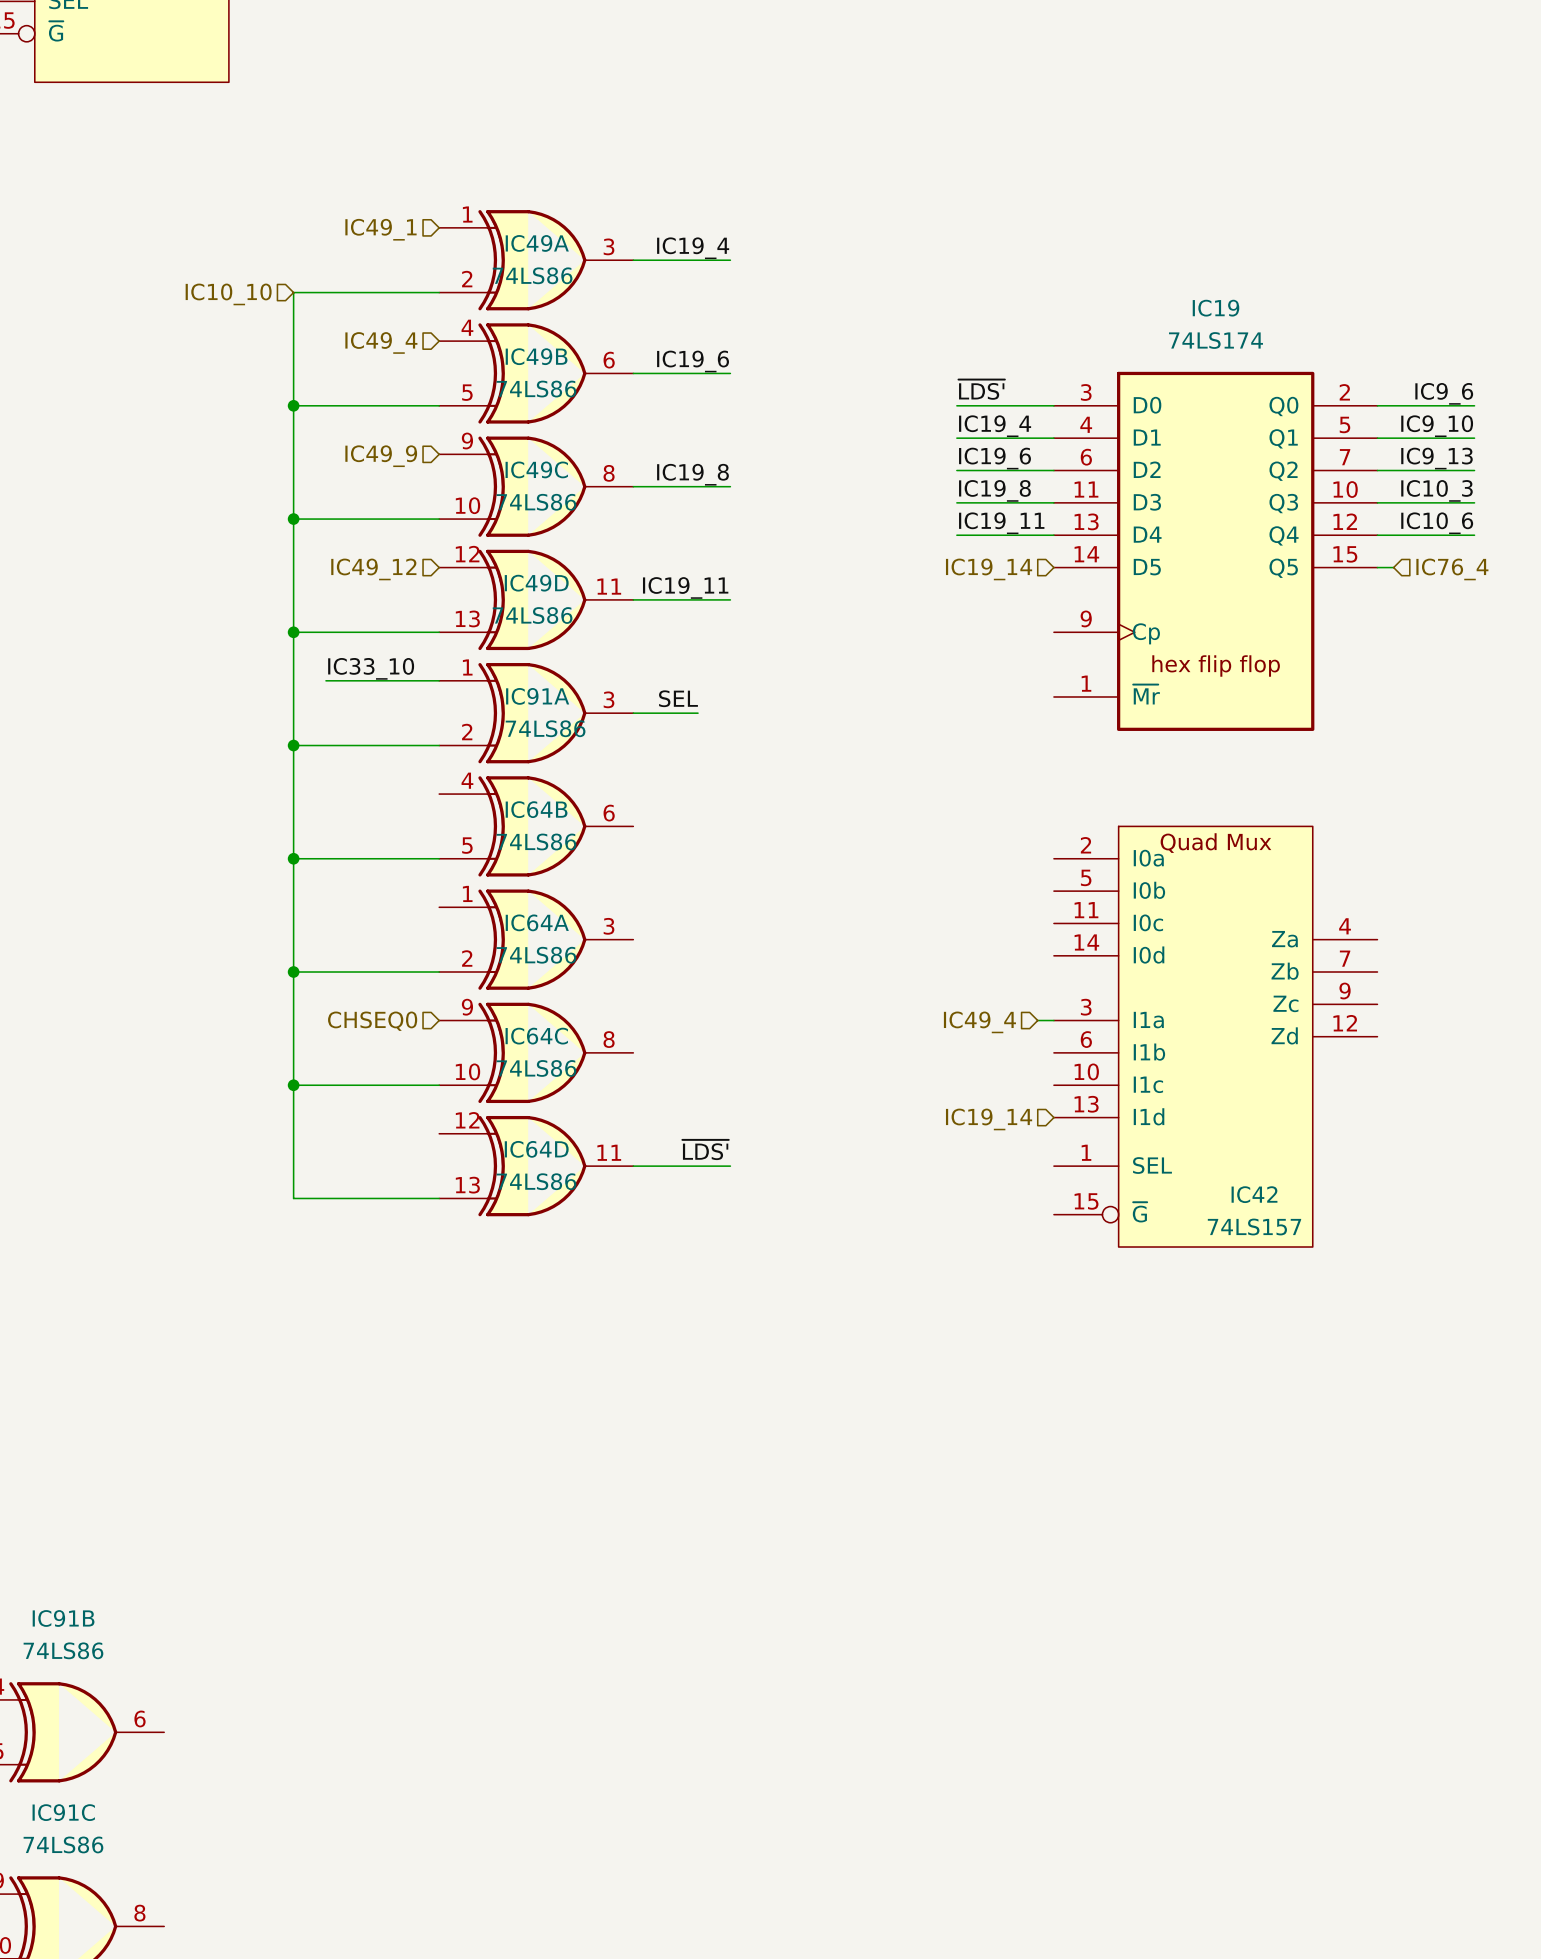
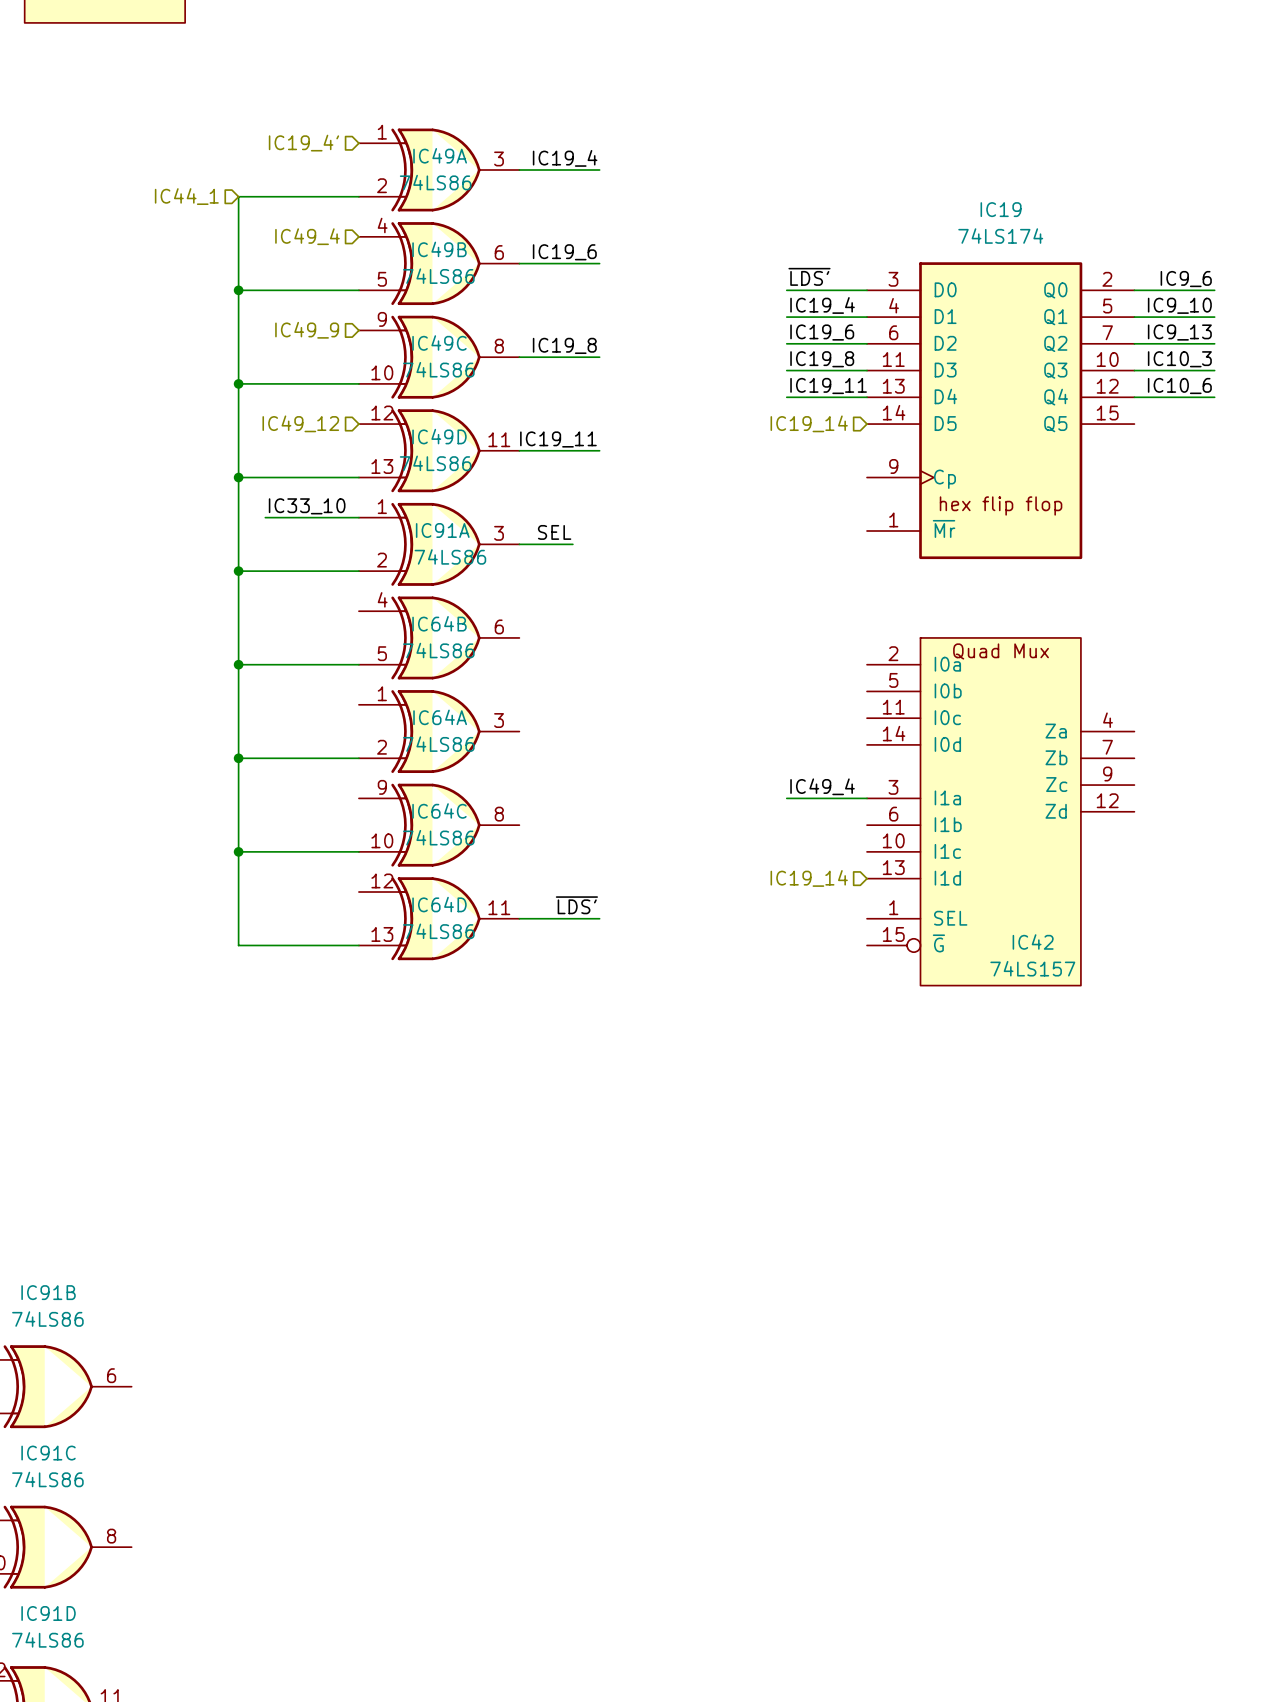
hierarchical label: IC49_1 (380, 229) -> IC19_4' (303, 143)
hierarchical label: IC10_10 (228, 294) -> IC44_1 (186, 196)
wire: (1377, 567) (1393, 567) -> none
hierarchical label: IC76_4 (1452, 569) -> none
IC42 symbol: [1053, 826, 1378, 1248] -> [867, 637, 1135, 986]
label: none -> IC49_4 (822, 786)
wire: none -> (786, 798) (853, 798)
hierarchical label: CHSEQ0 (372, 1021) -> none
hierarchical label: IC49_4 (979, 1022) -> none

